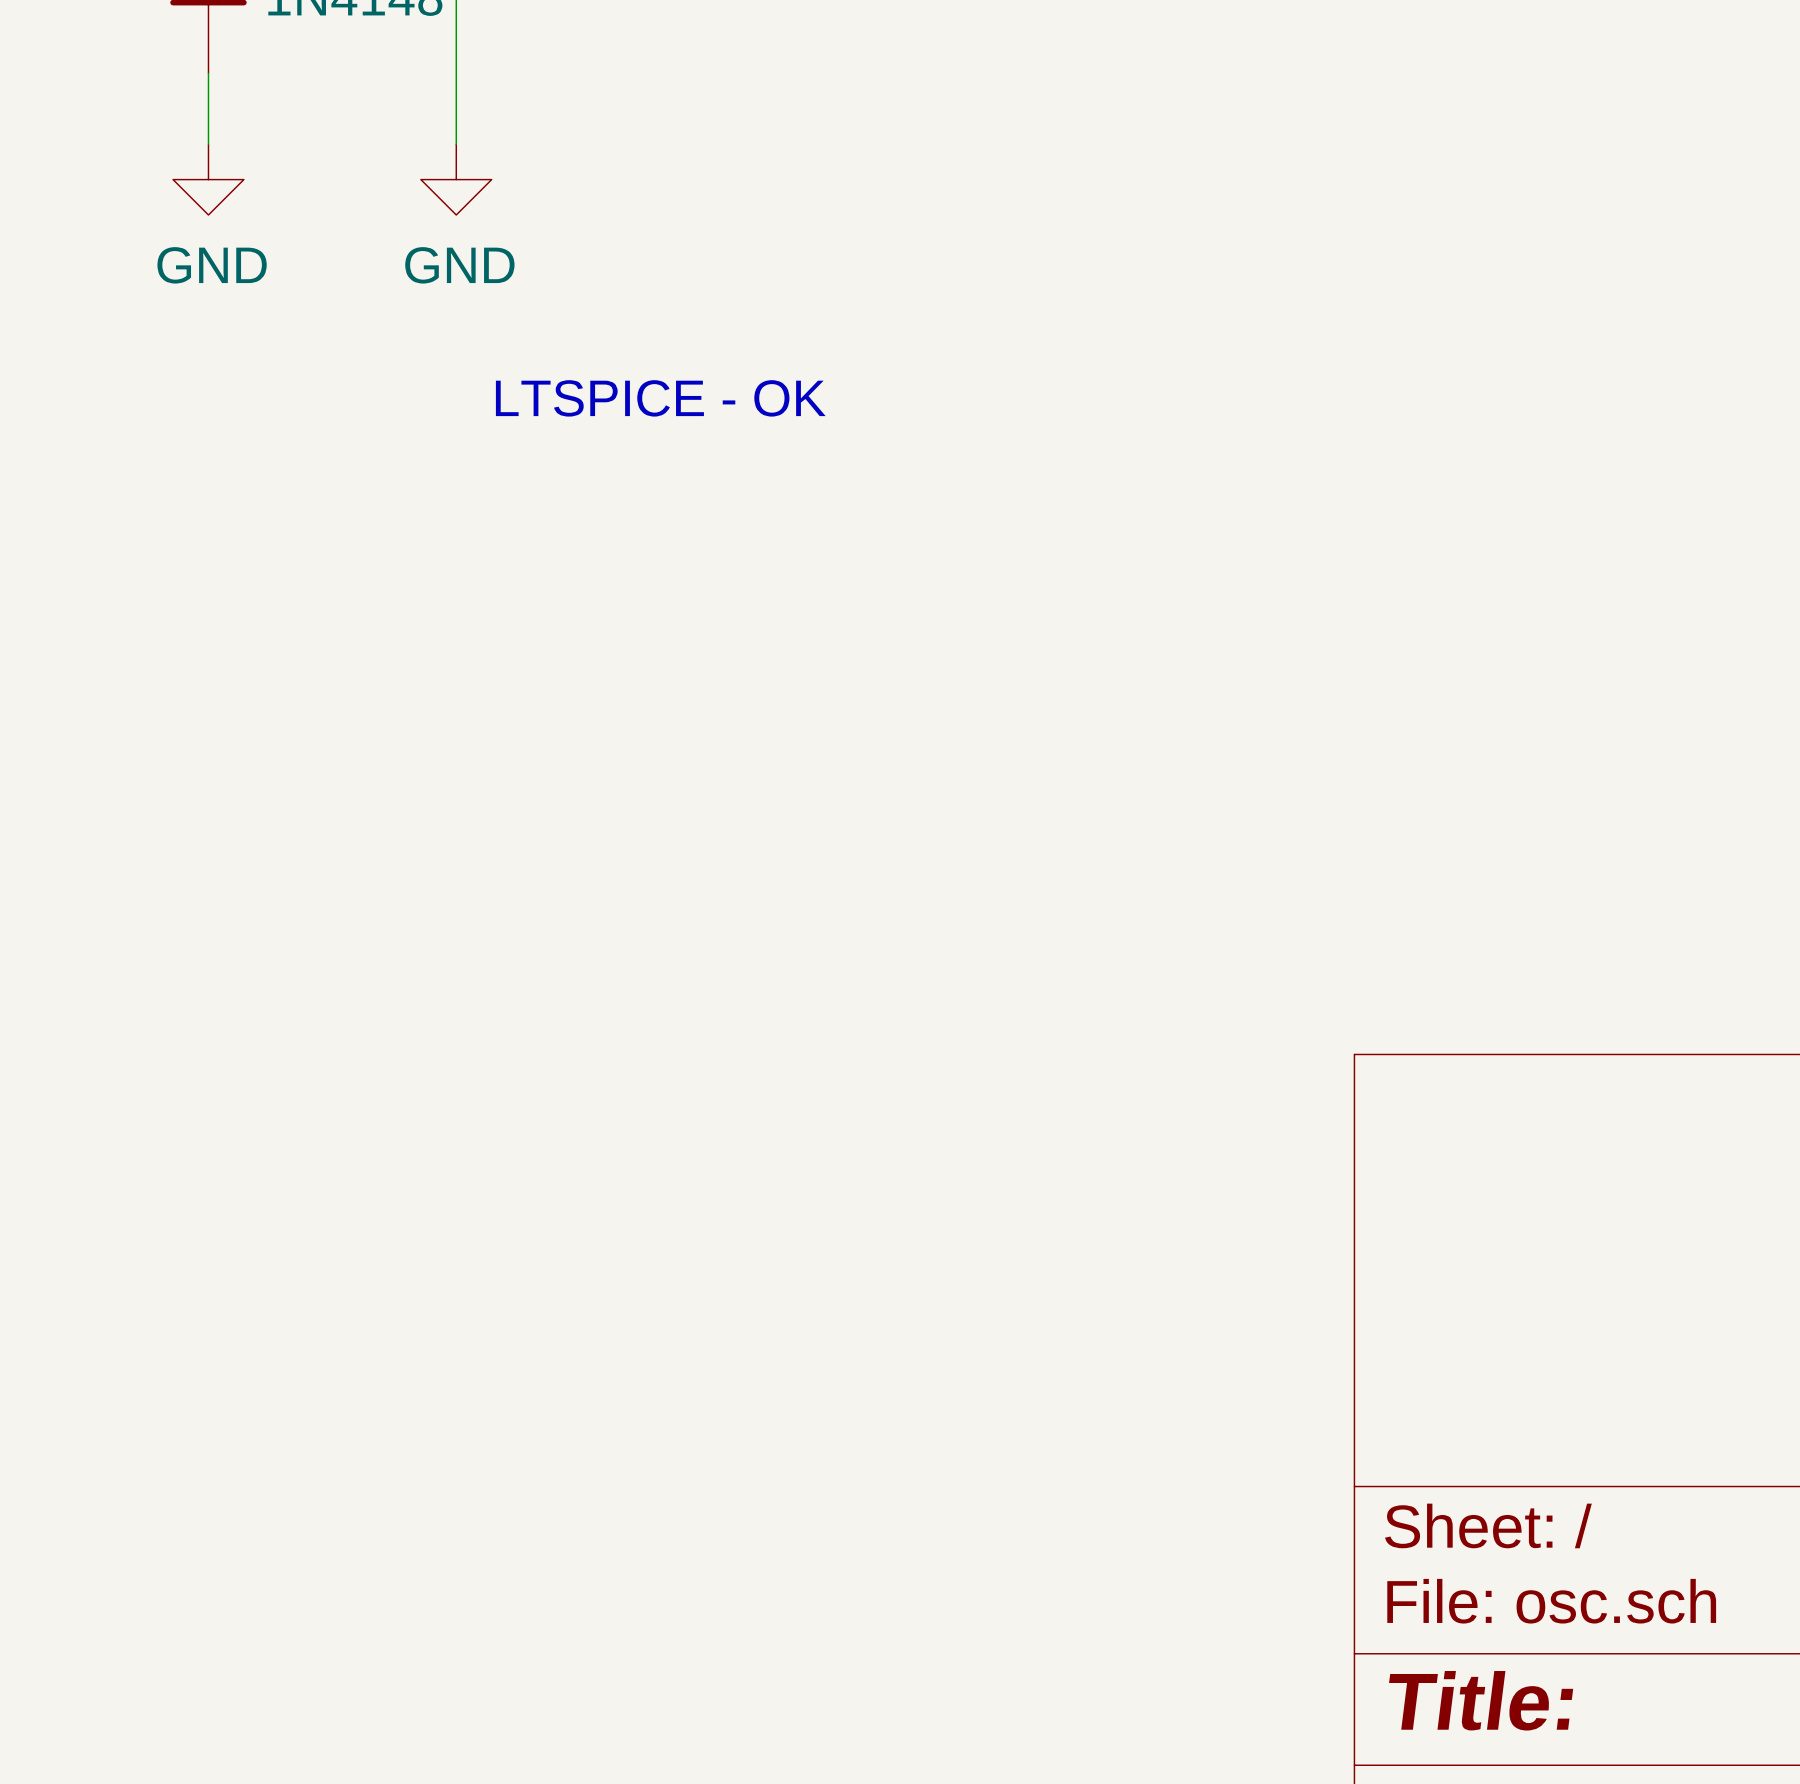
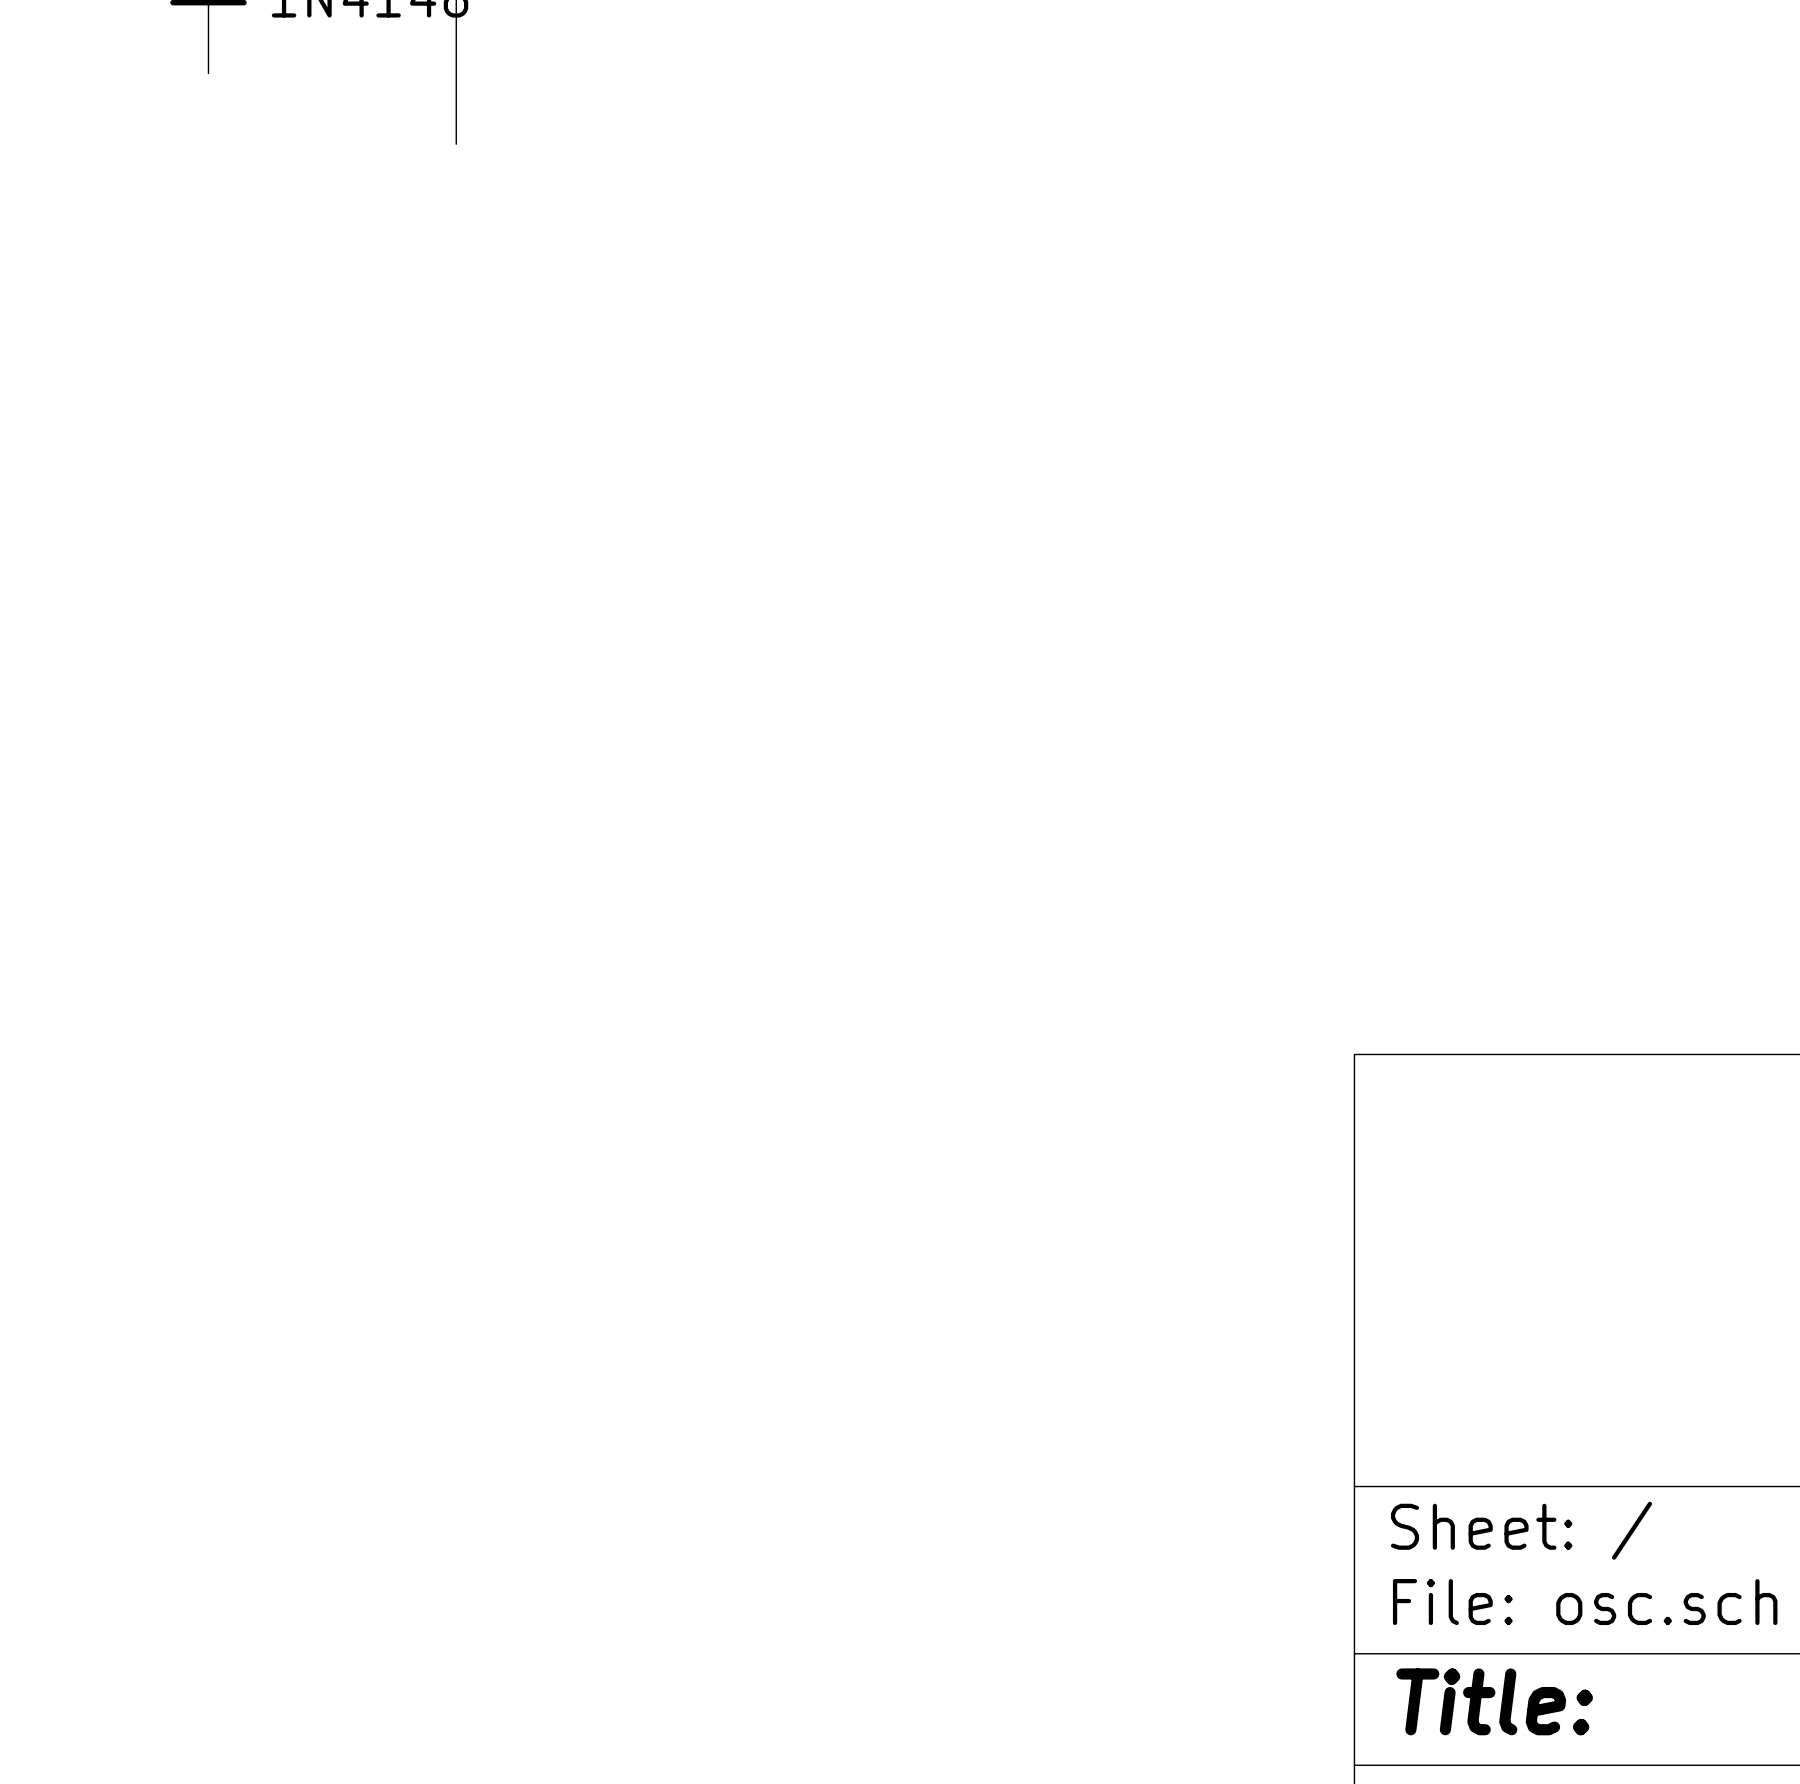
wire: (208, 73) (208, 144) -> none
power symbol: GND (208, 179) -> none
power symbol: GND (456, 179) -> none
text: LTSPICE - OK (660, 398) -> none

